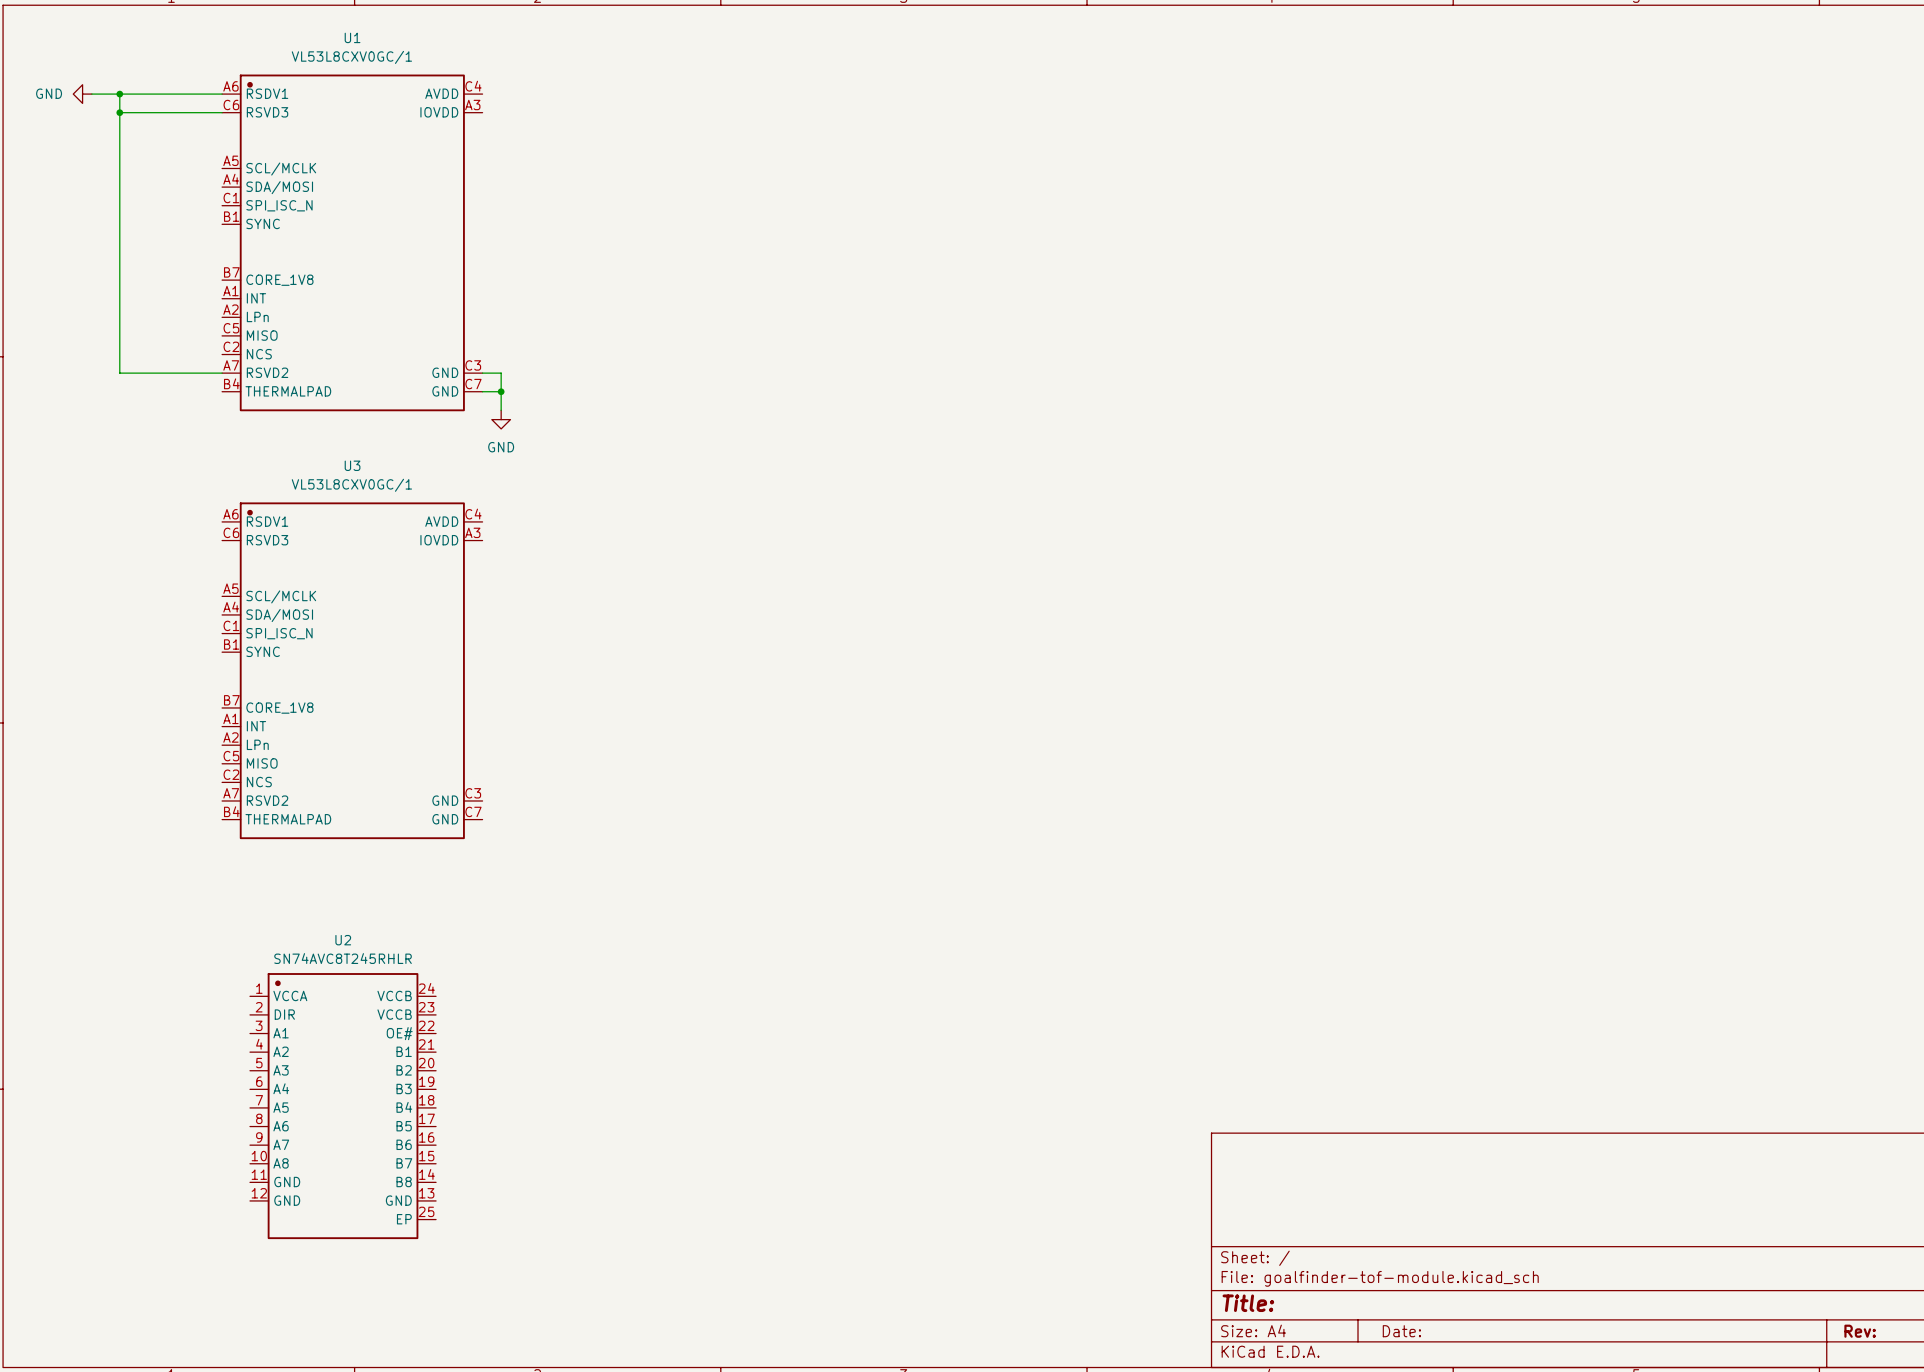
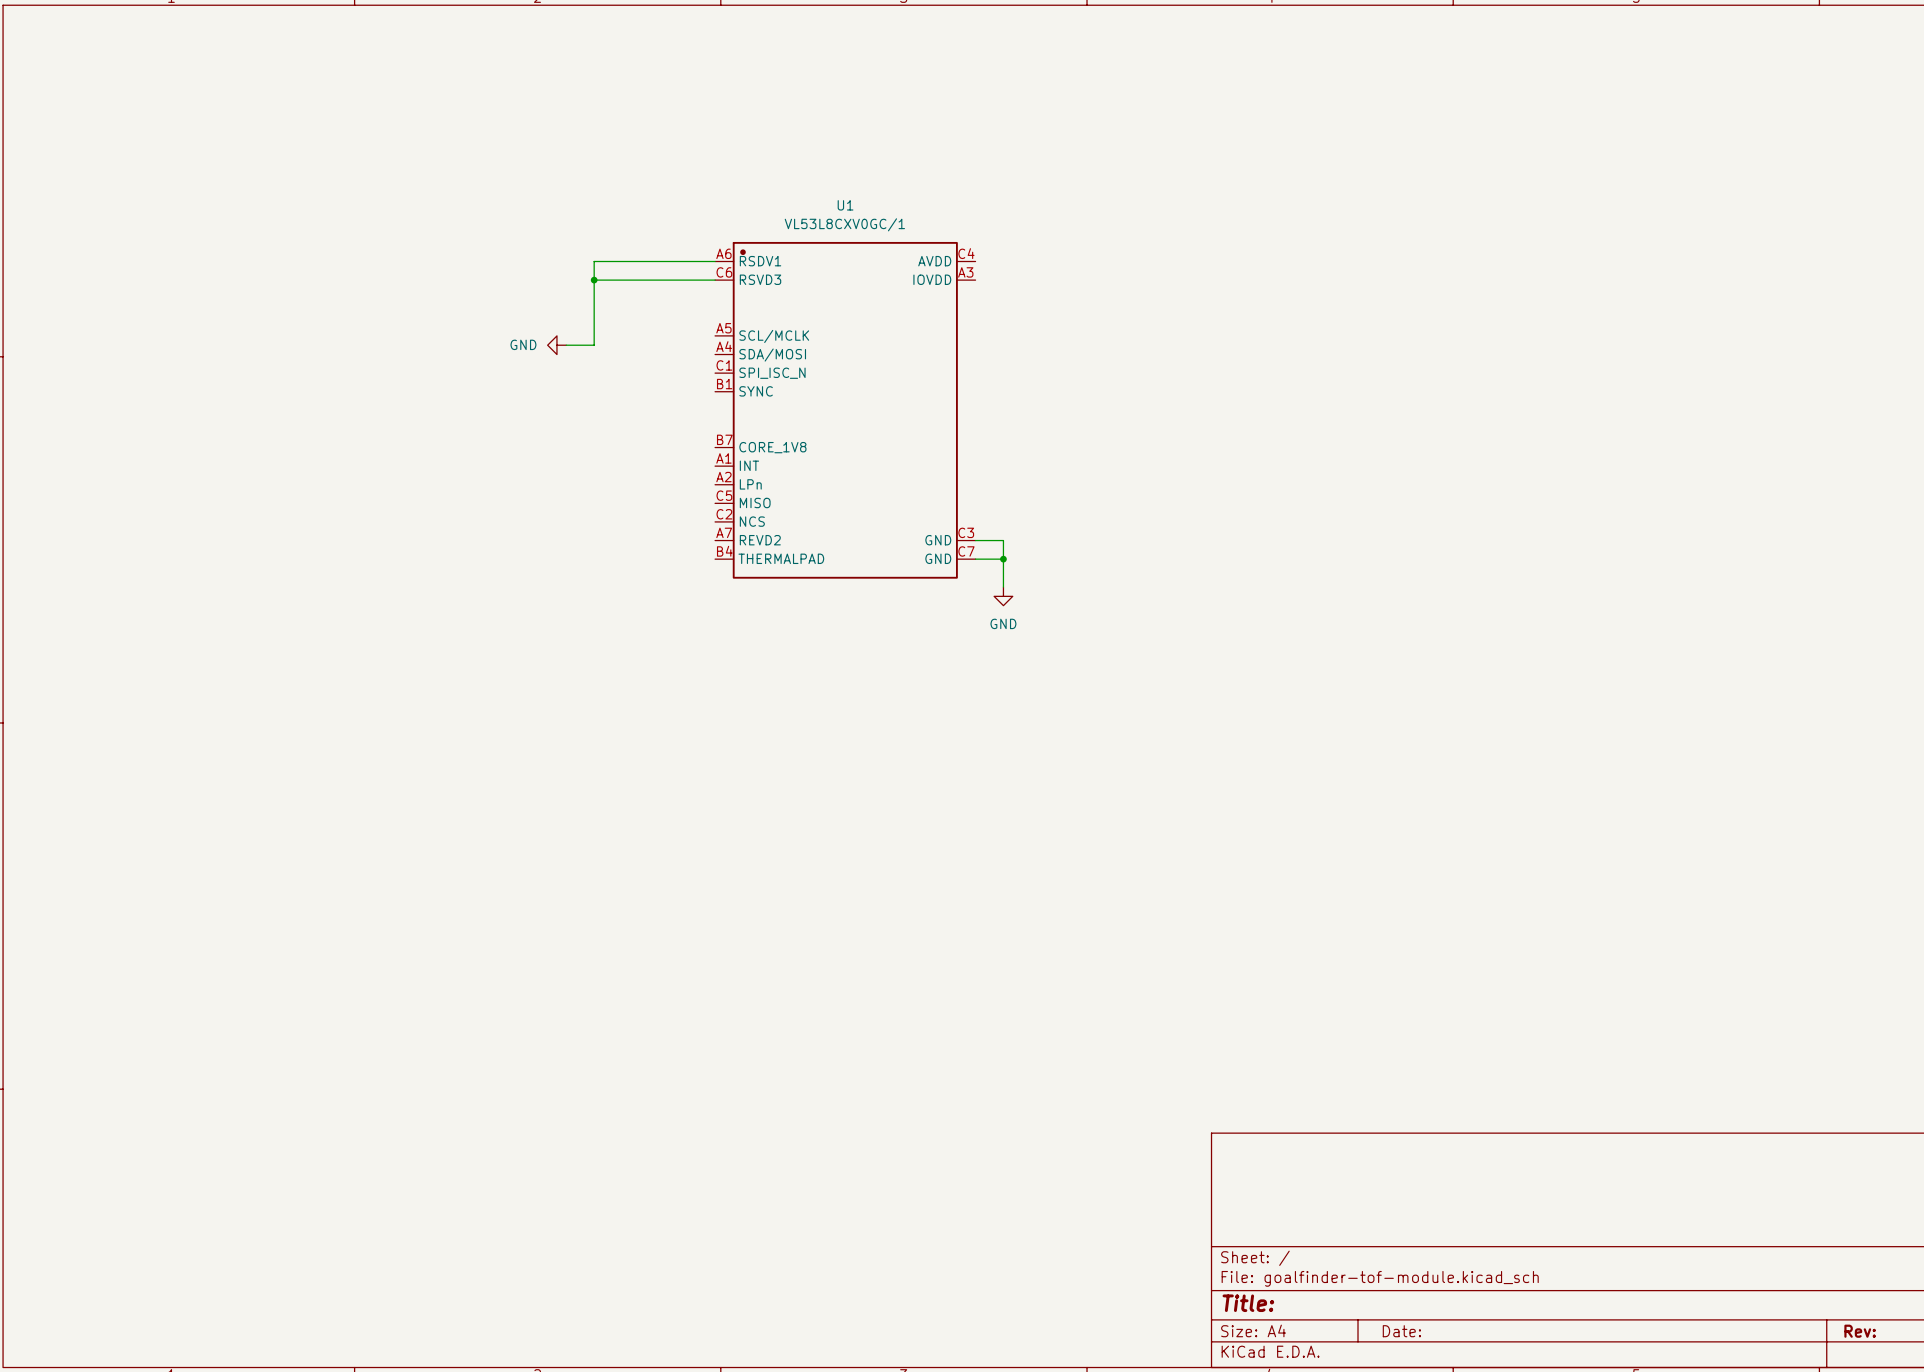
power symbol: GND (82, 94) -> none
wire: (91, 94) (222, 94) -> none
wire: (119, 94) (119, 373) (222, 373) -> none
junction: (119, 94) -> none
wire: (119, 112) (222, 112) -> none
junction: (119, 112) -> none
U1 position: (352, 242) -> (845, 410)
wire: none -> (715, 261) (594, 261) (594, 345) (566, 345)
wire: none -> (594, 280) (715, 280)
junction: none -> (594, 280)
U1 pin name: RSVD2 (267, 372) -> REVD2 (760, 540)
wire: (482, 373) (501, 373) (501, 410) -> none
wire: (482, 391) (501, 391) -> none
junction: (501, 391) -> none
power symbol rotation: 0° (501, 419) -> 90° clockwise (556, 345)
power symbol position: GND (501, 419) -> GND (556, 345)
wire: none -> (975, 540) (1003, 540) (1003, 587)
wire: none -> (975, 559) (1003, 559)
junction: none -> (1003, 559)
power symbol: none -> GND (1003, 596)
U3: VL53L8CXV0GC/1 (352, 670) -> none
U2: SN74AVC8T245RHLR (343, 1106) -> none

